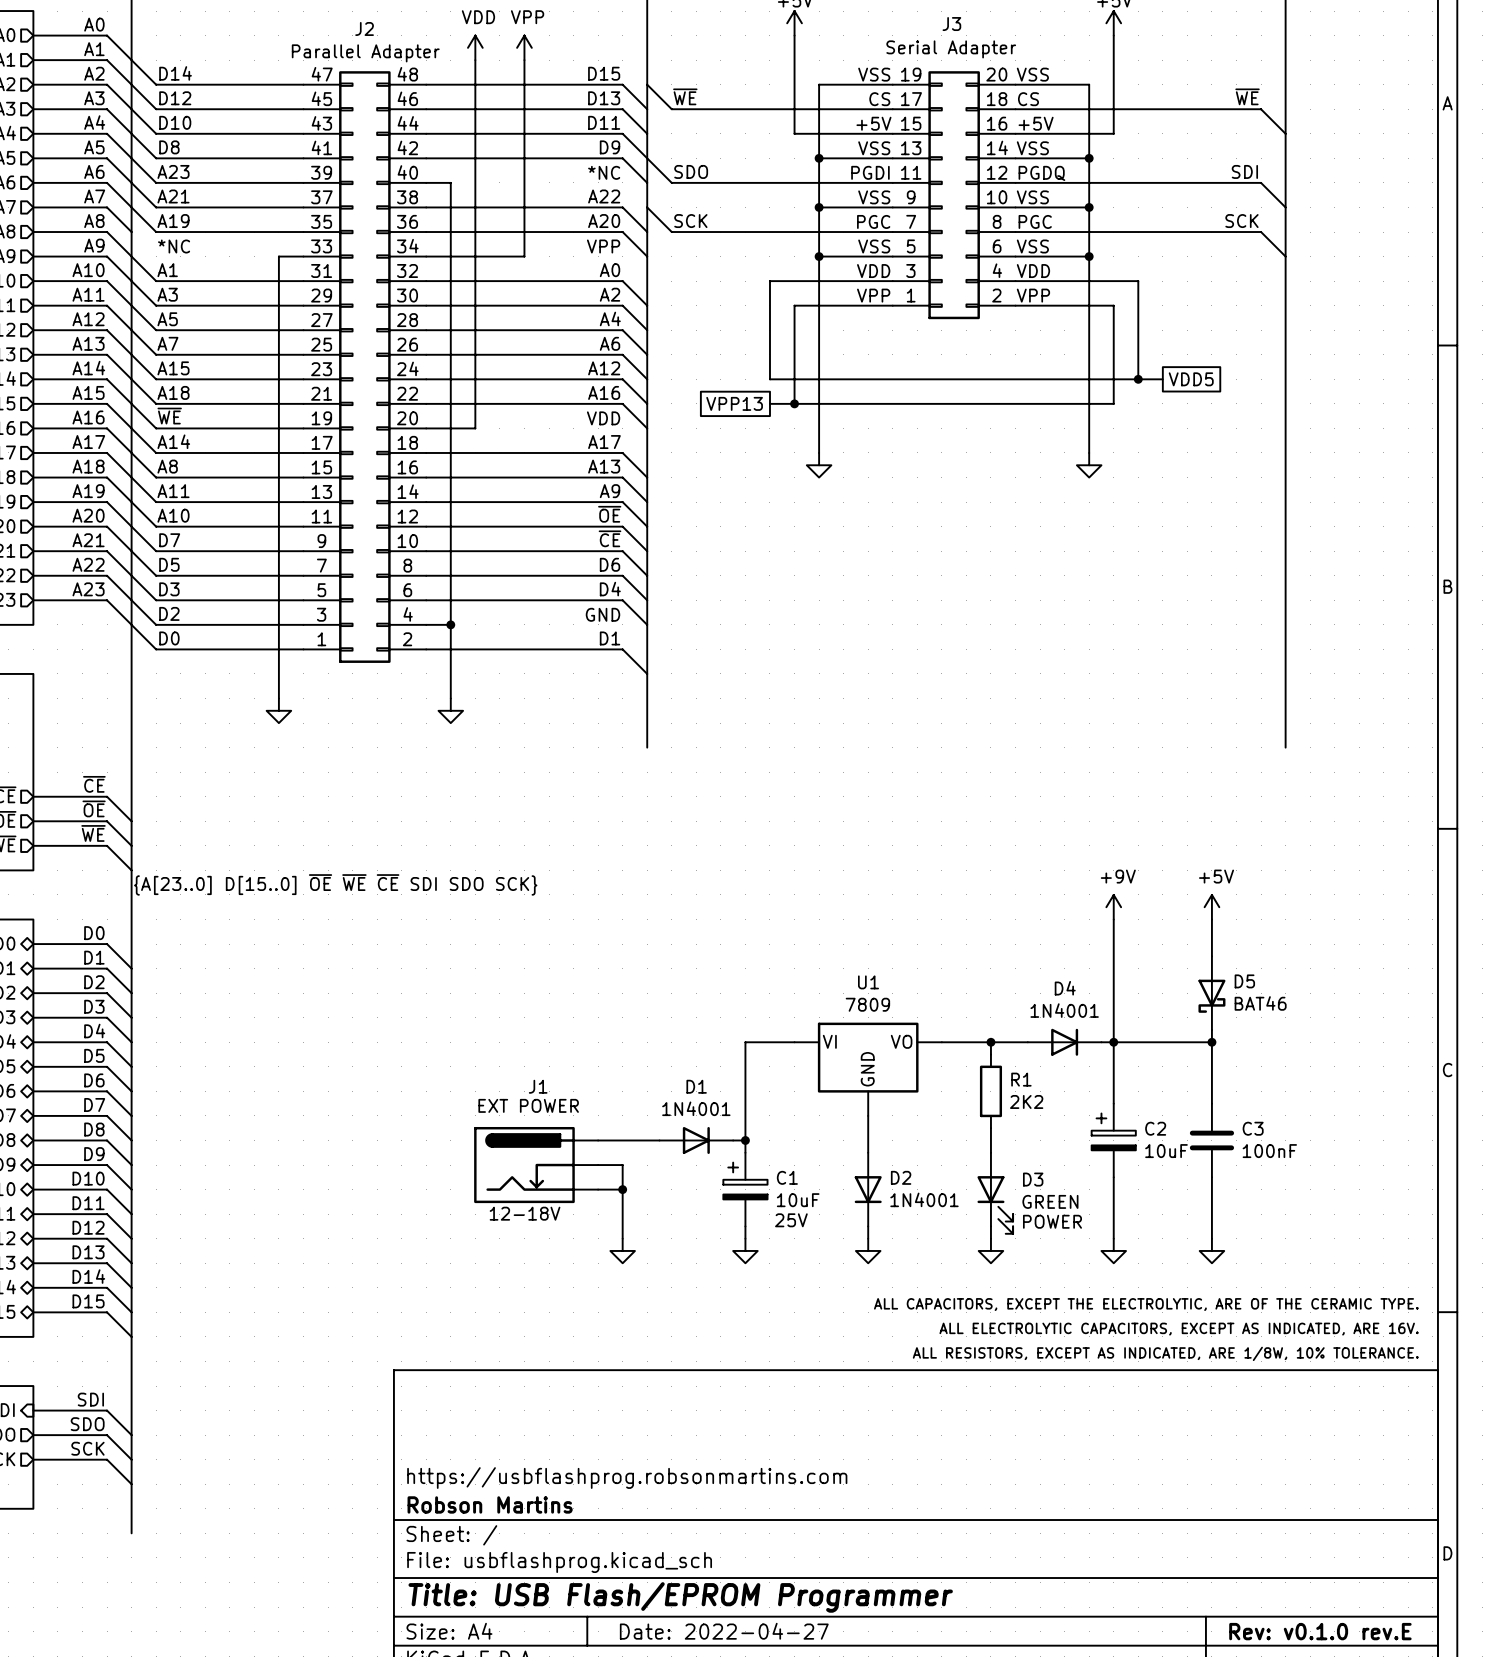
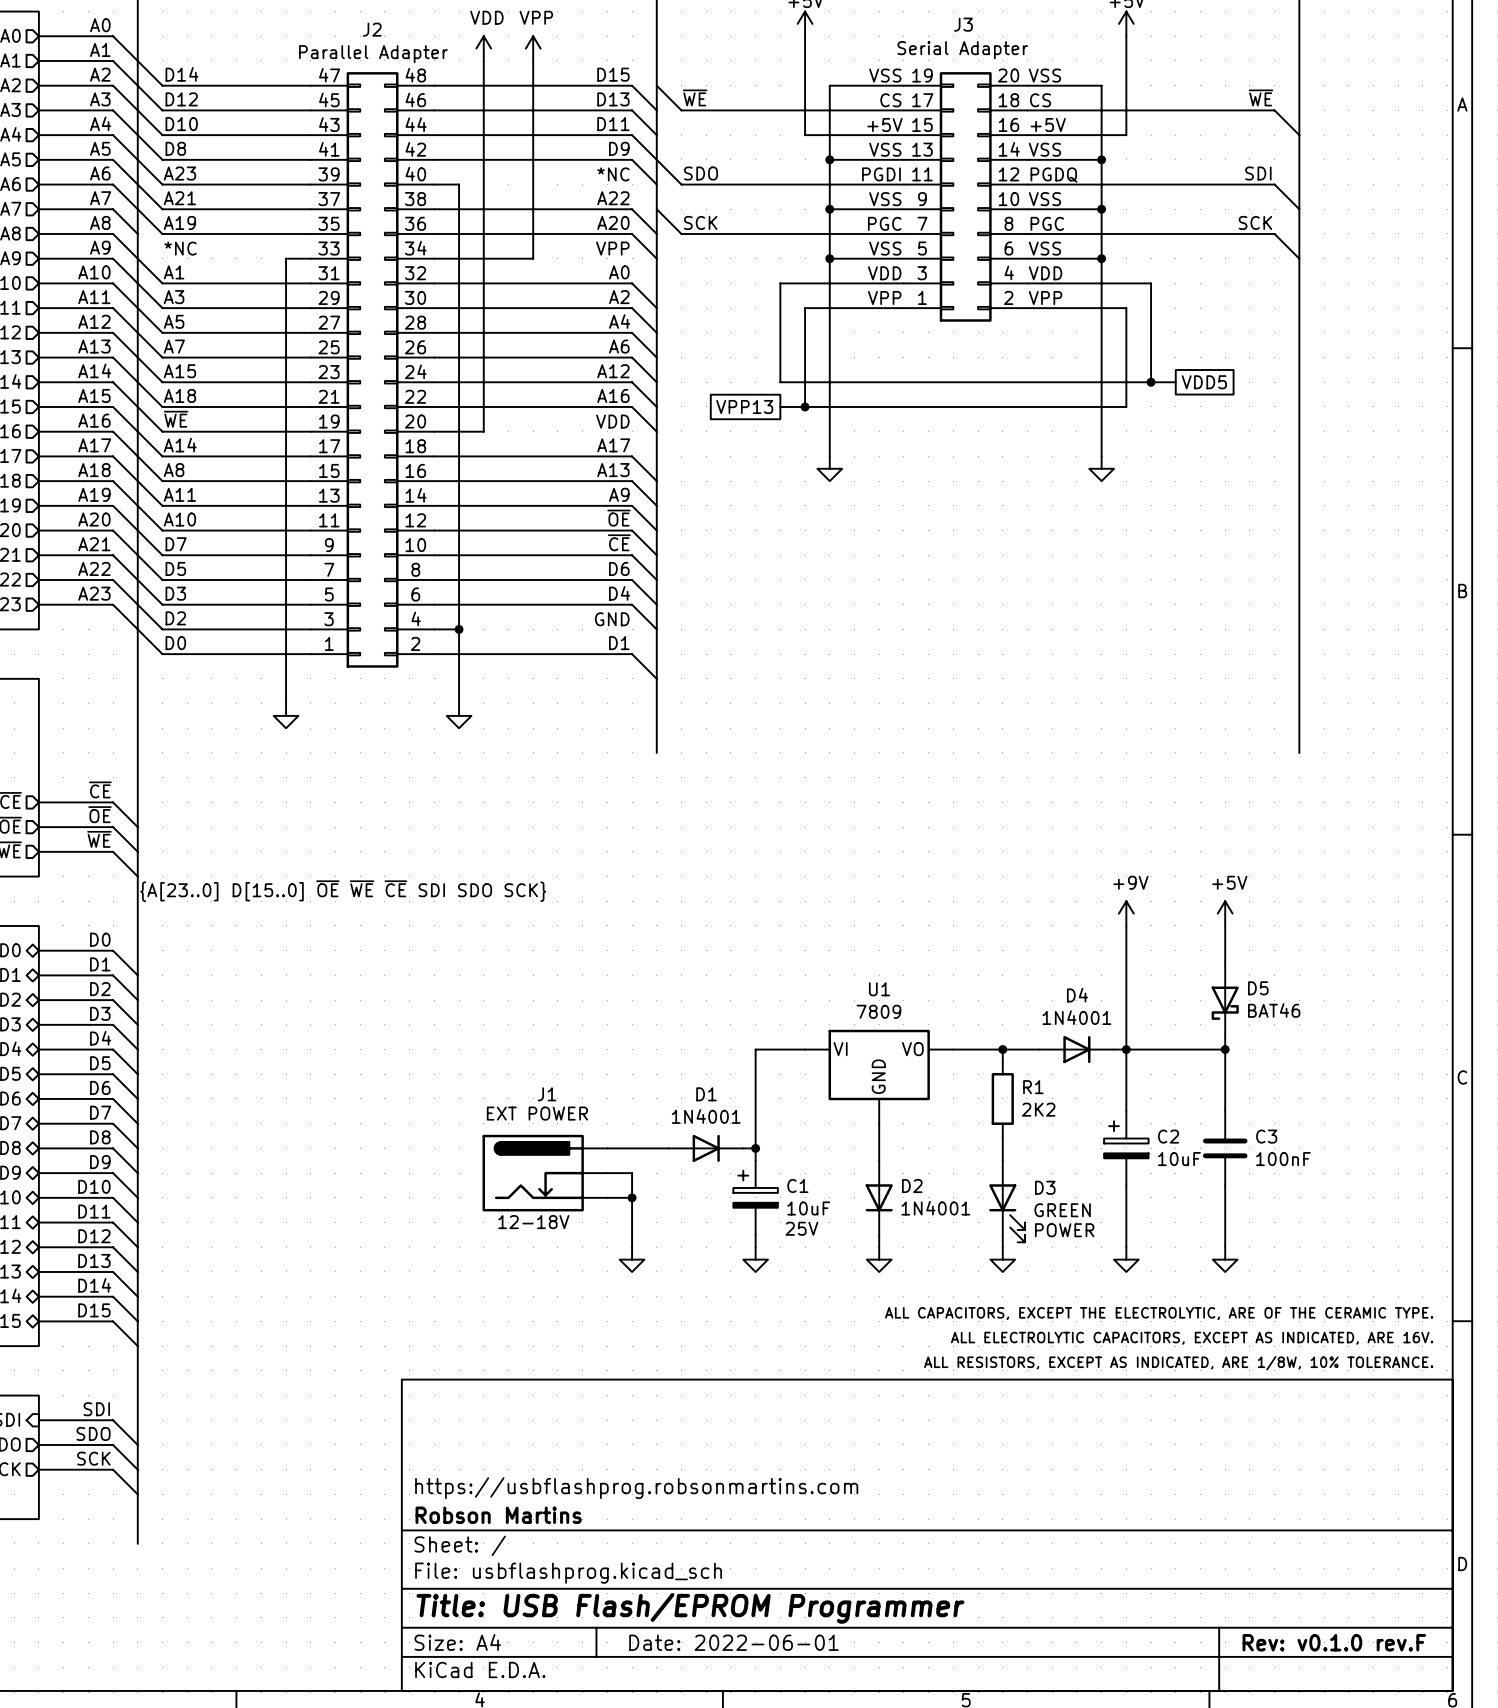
title block: Date: 2022-04-27 (724, 1631) -> Date: 2022-06-01 (733, 1642)
title block: Rev: v0.1.0 rev.E (1320, 1631) -> Rev: v0.1.0 rev.F (1334, 1642)

